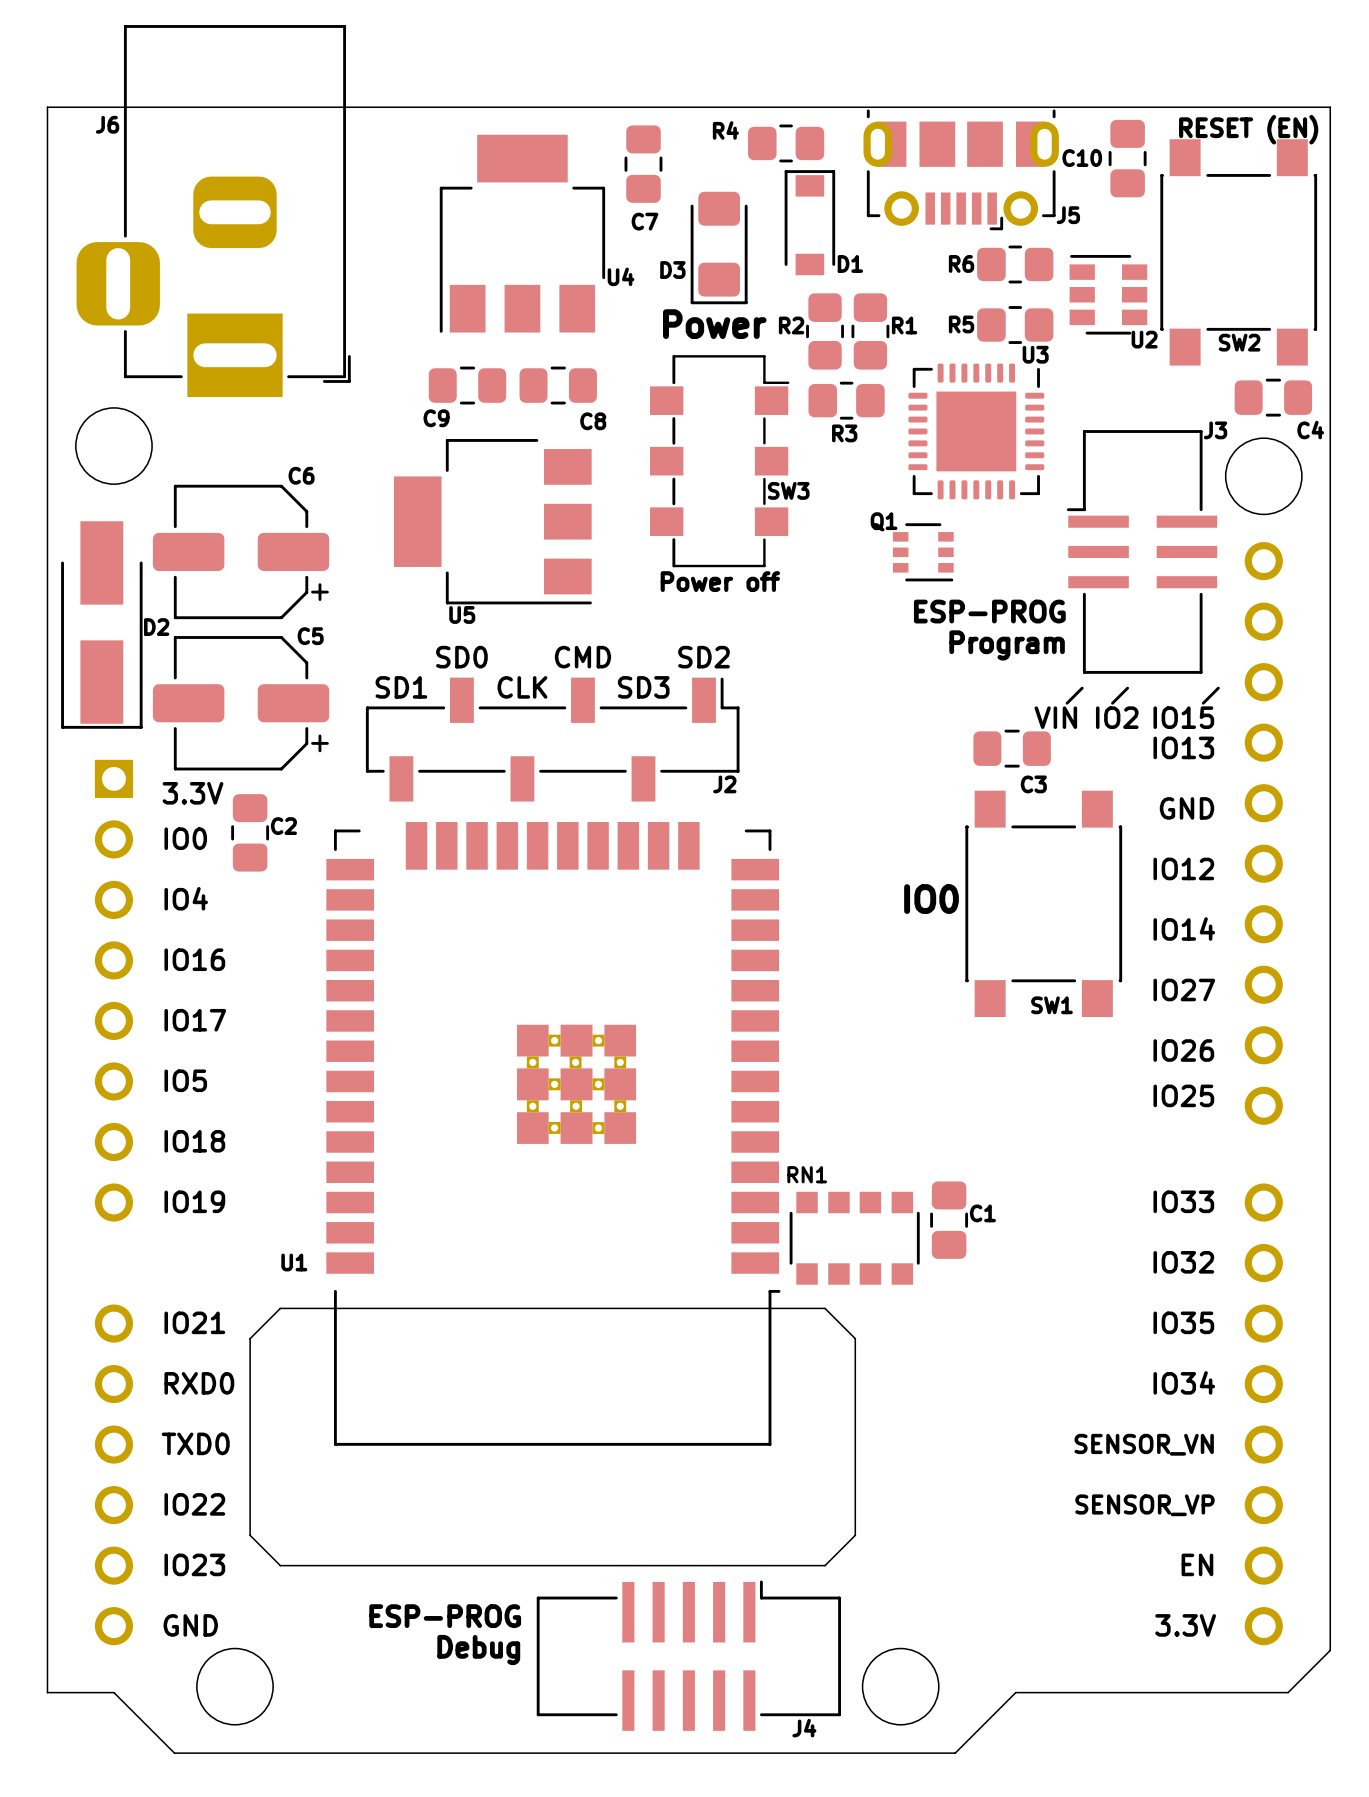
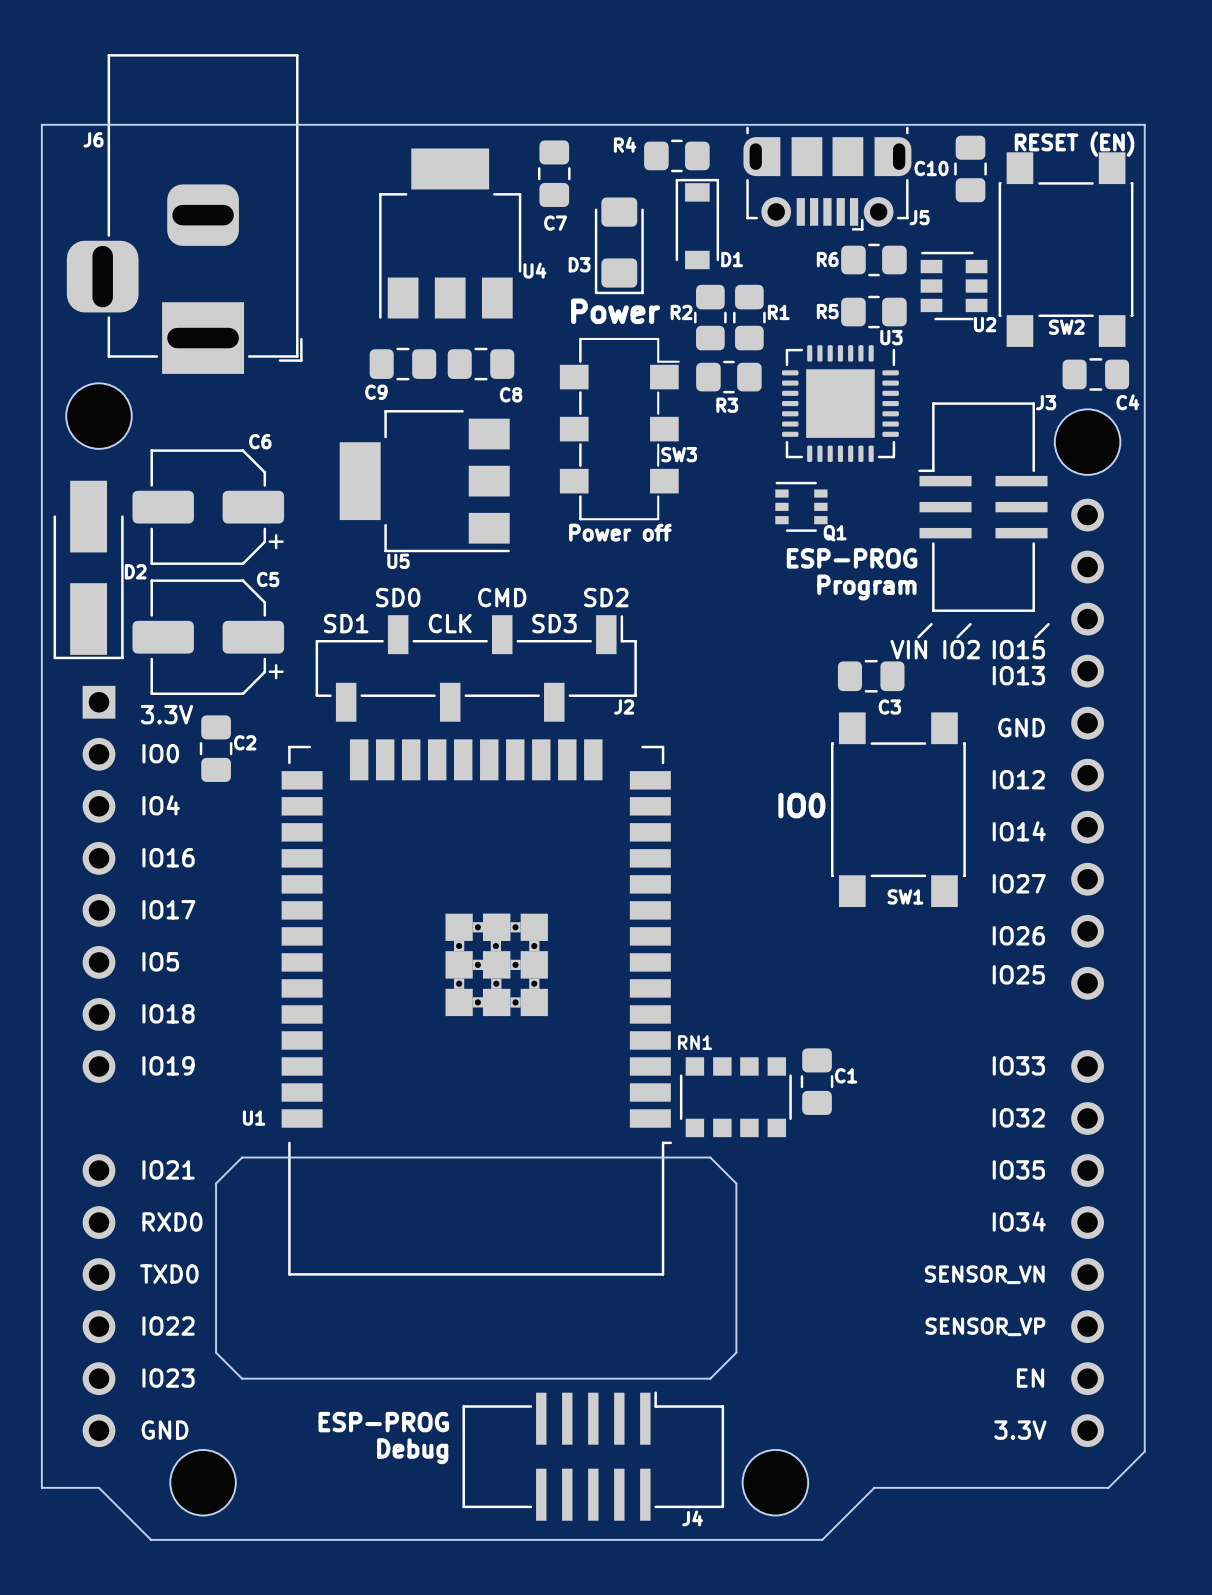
Q1 rotation: 0° (923, 552) -> 180° (801, 506)

